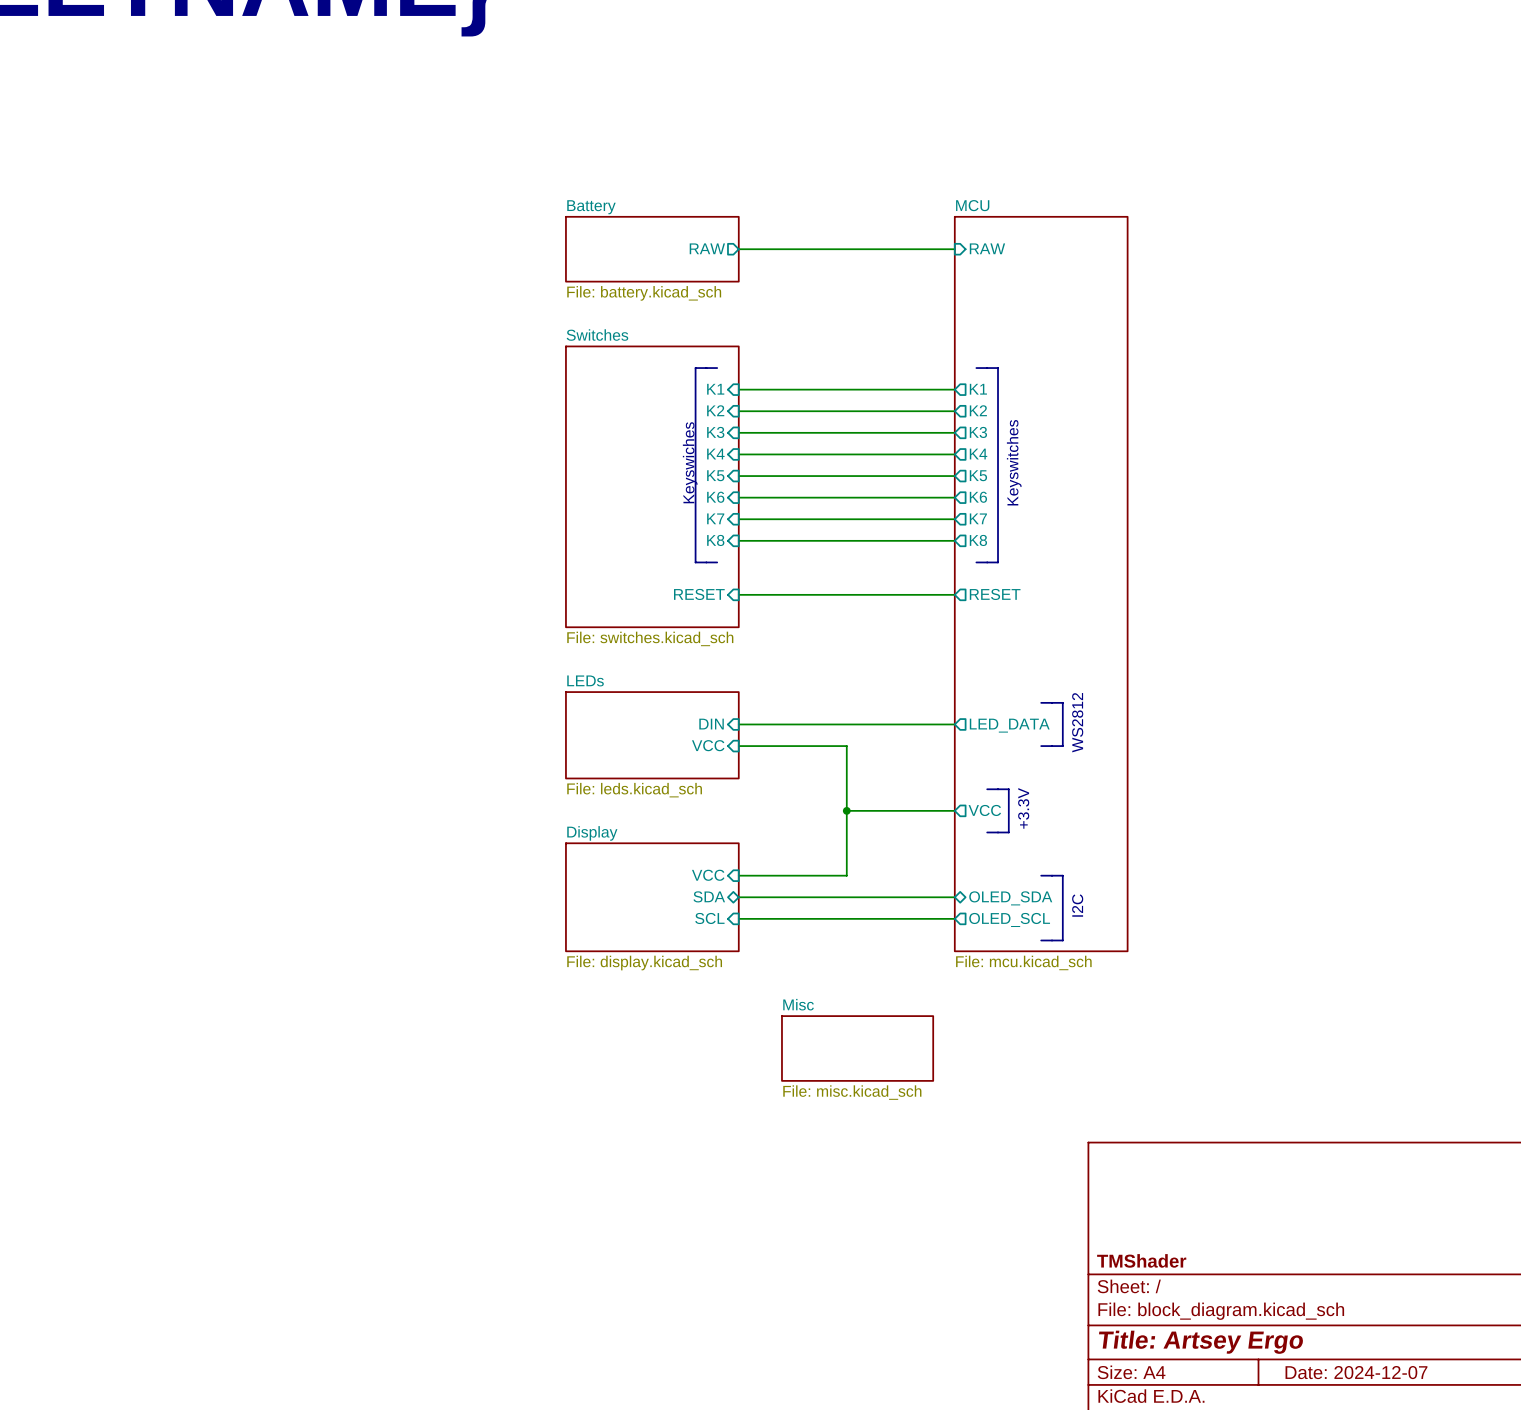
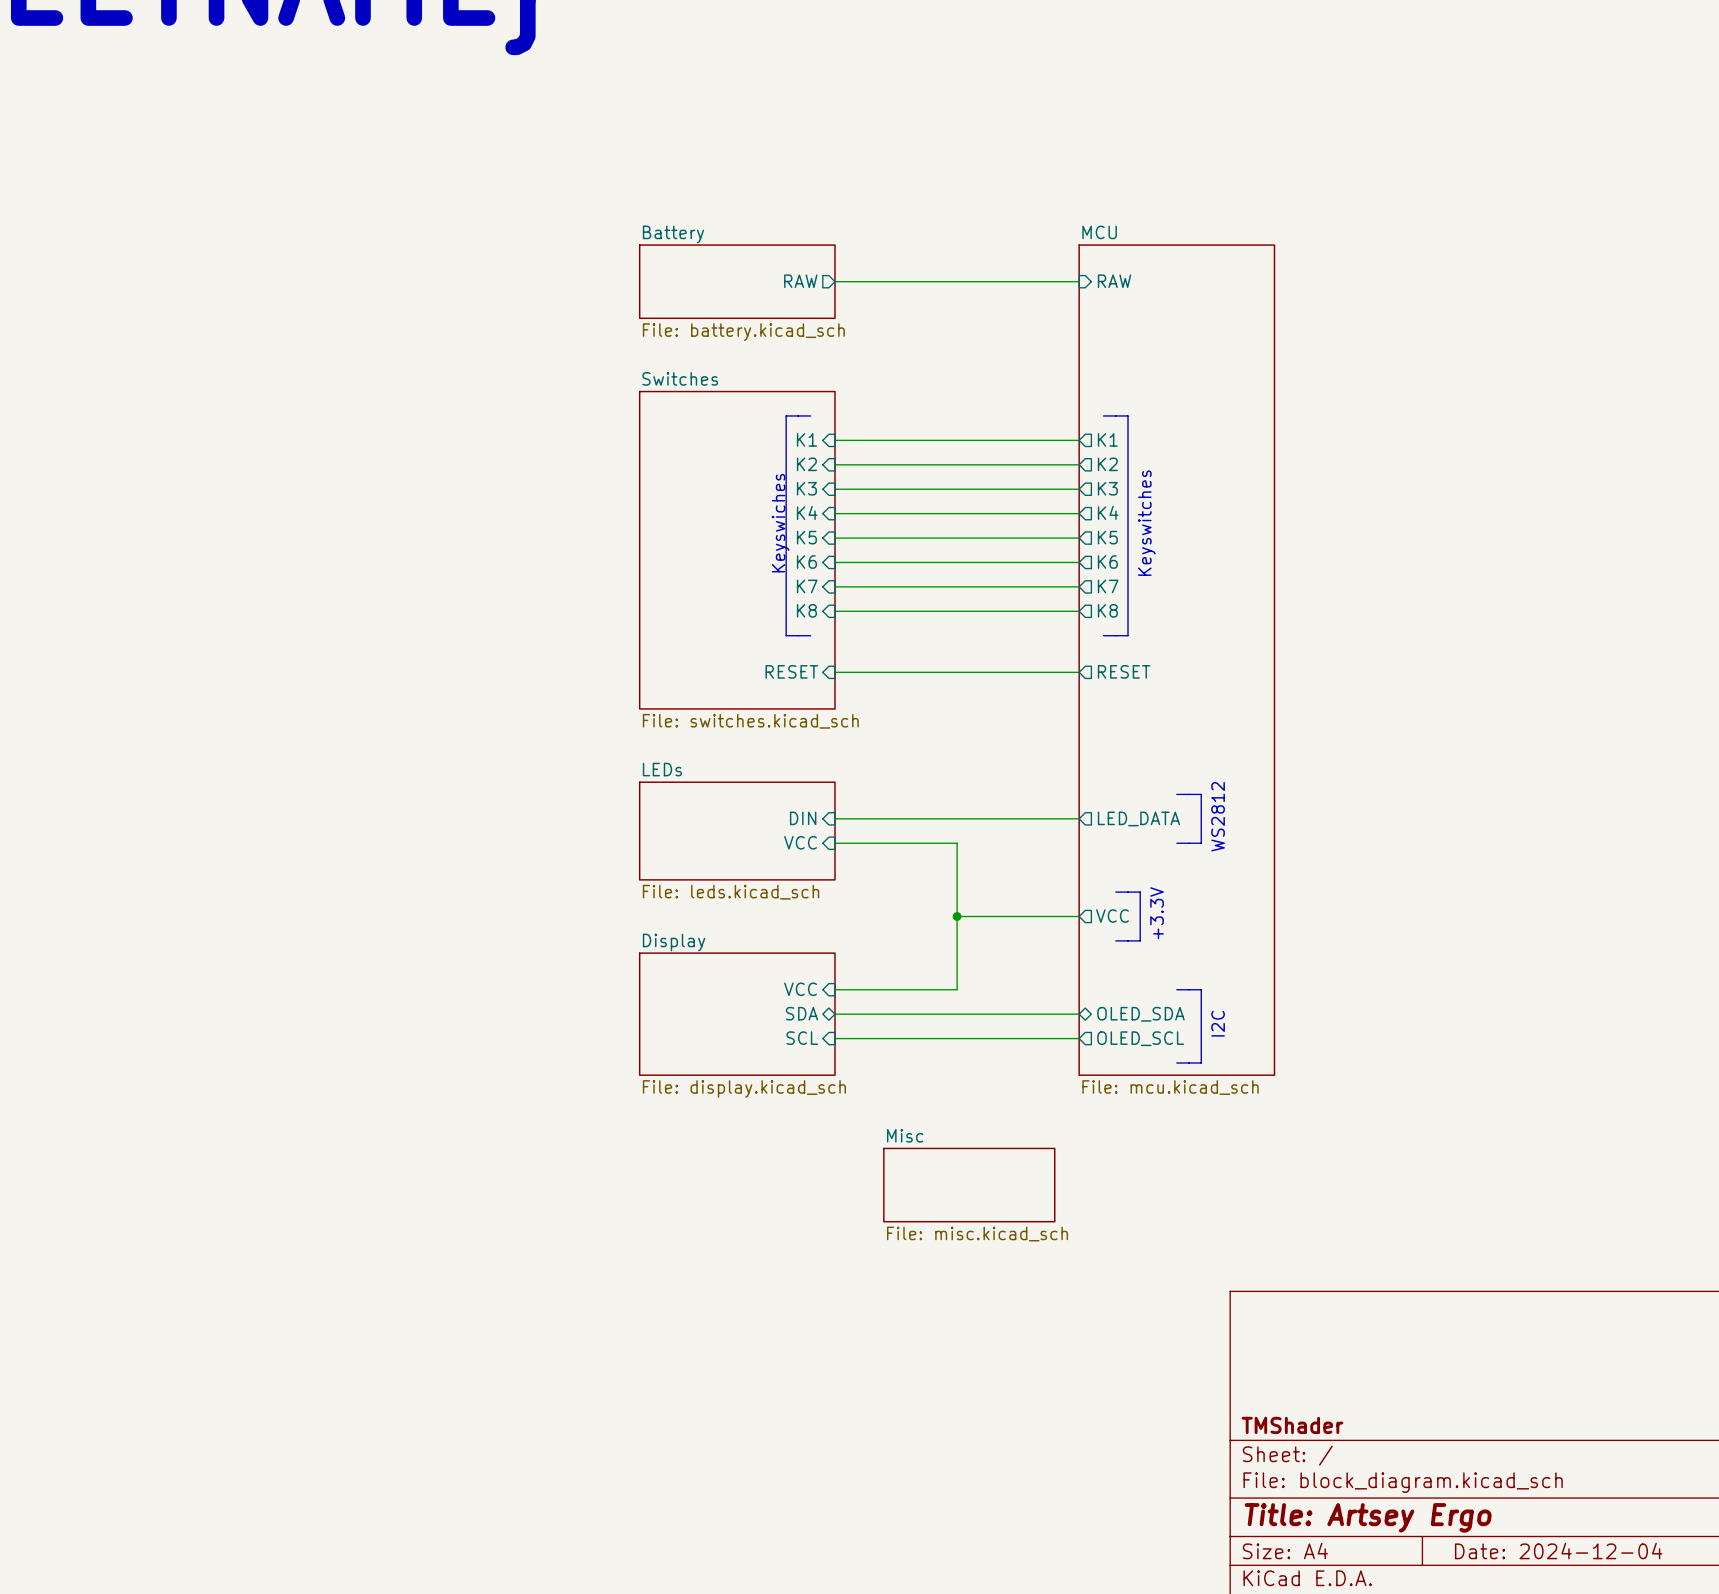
title block: Date: 2024-12-07 (1356, 1372) -> Date: 2024-12-04 (1558, 1551)

